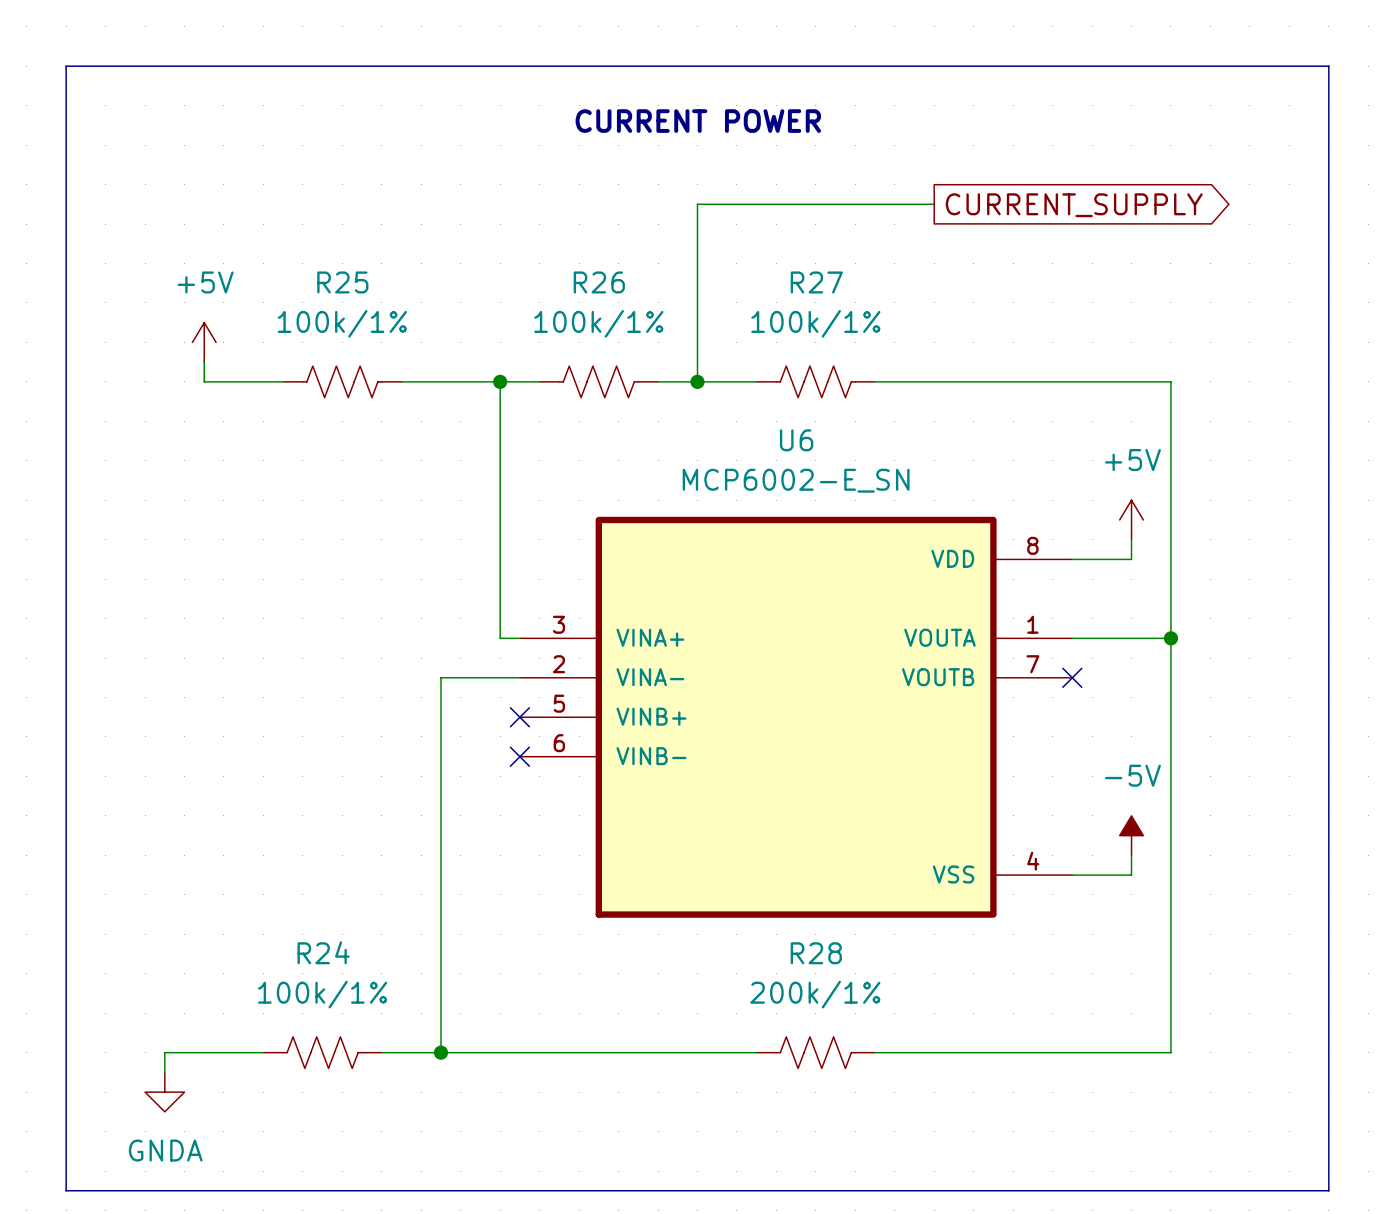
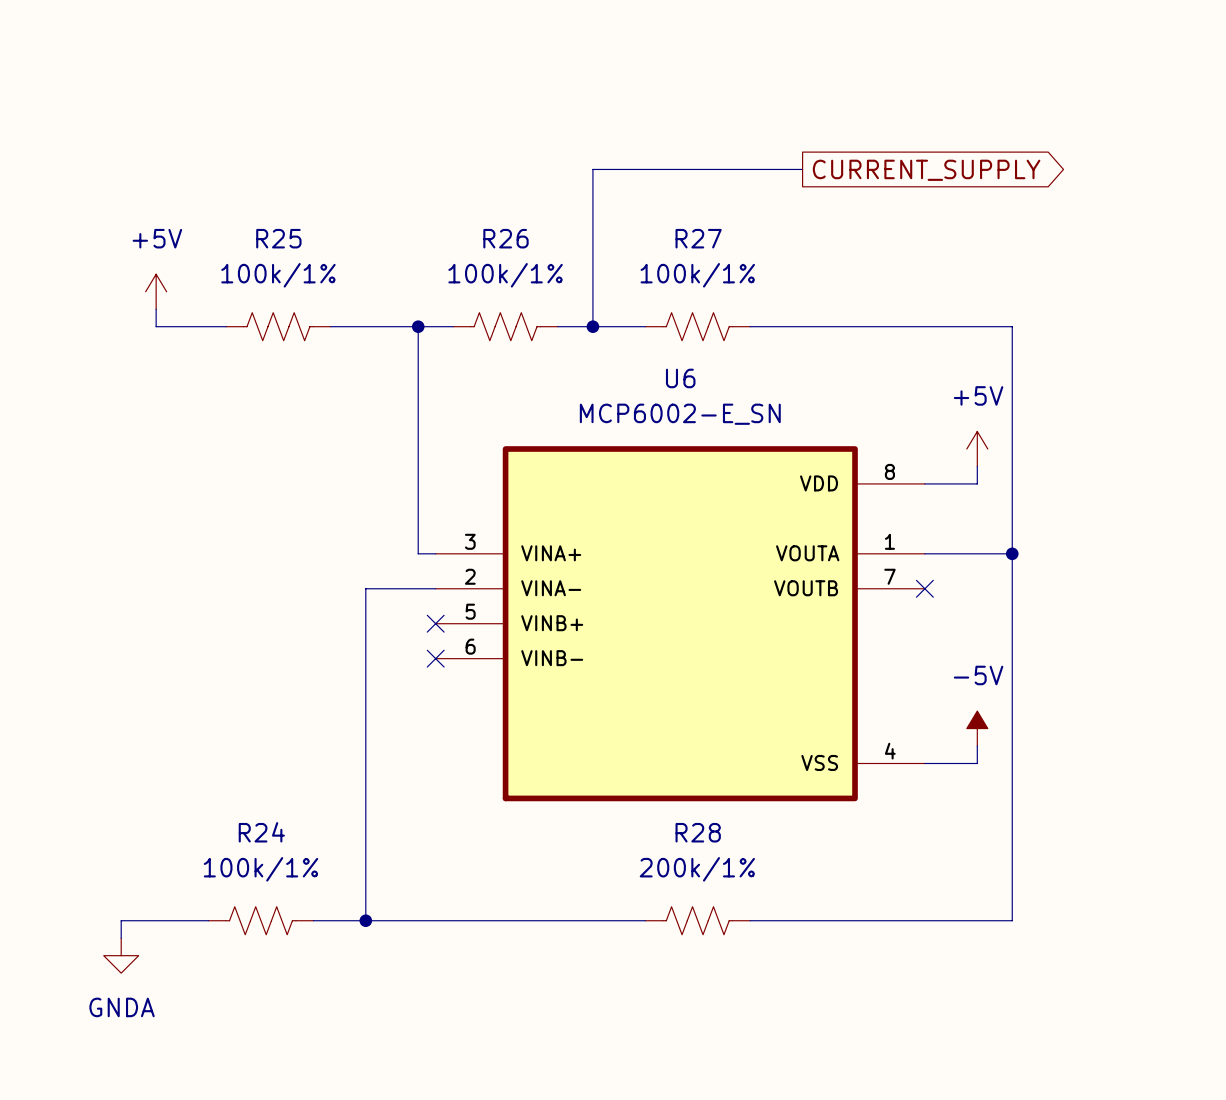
line: (66, 66) (1328, 66) (1328, 1190) (66, 1190) (66, 66) -> none
text: CURRENT POWER (698, 121) -> none

